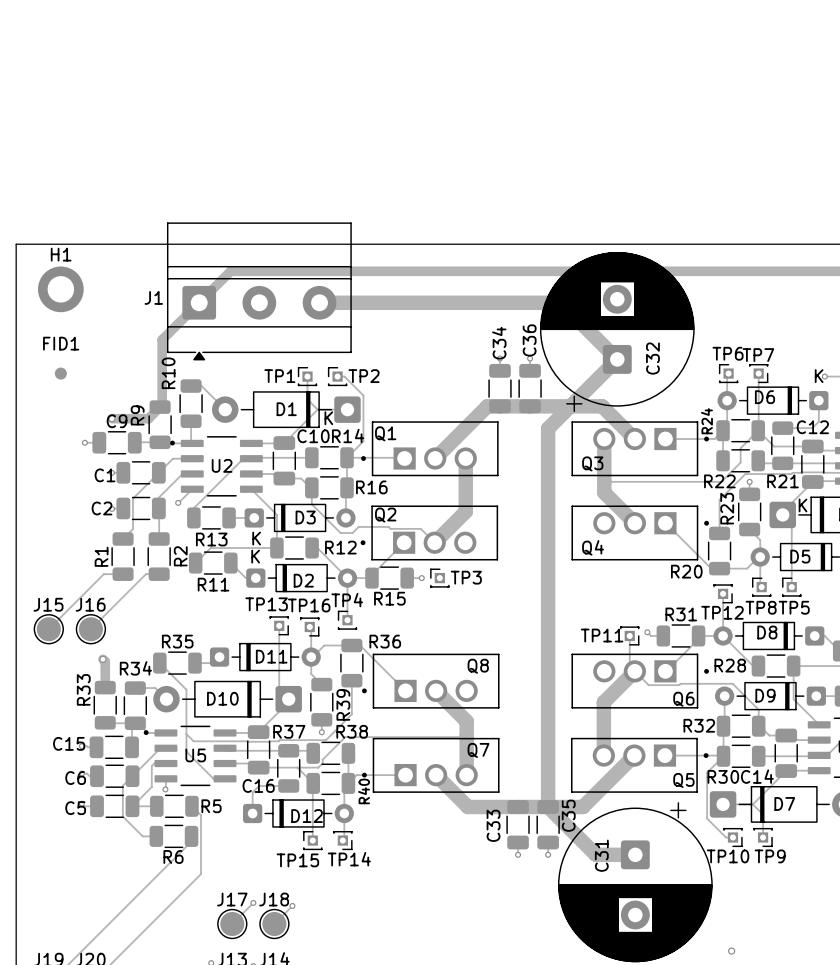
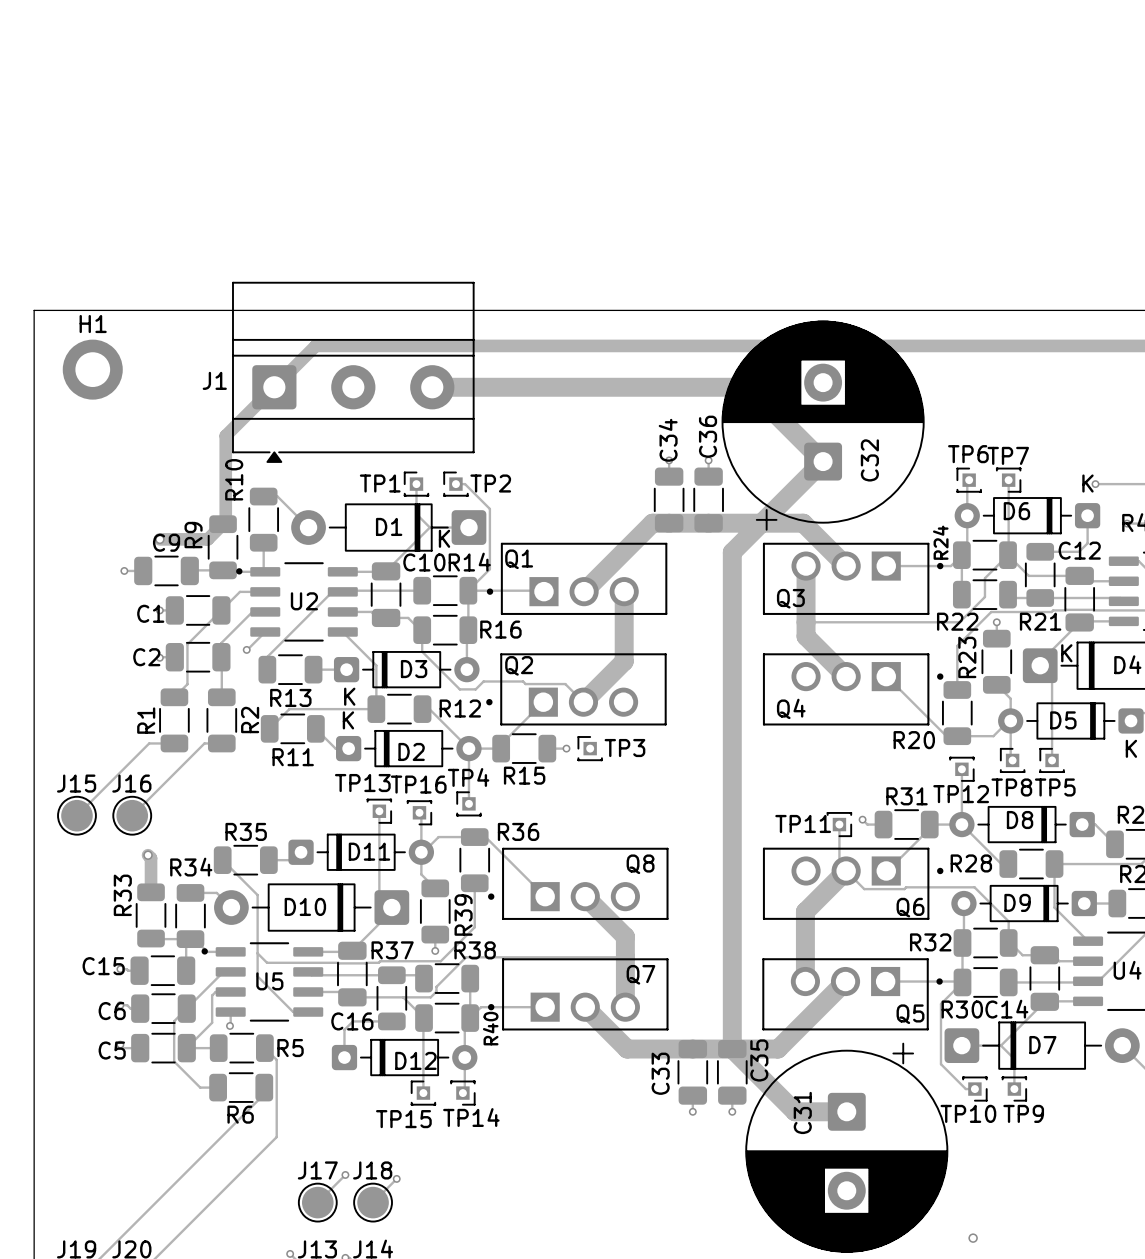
FID1: (60, 373) -> none

